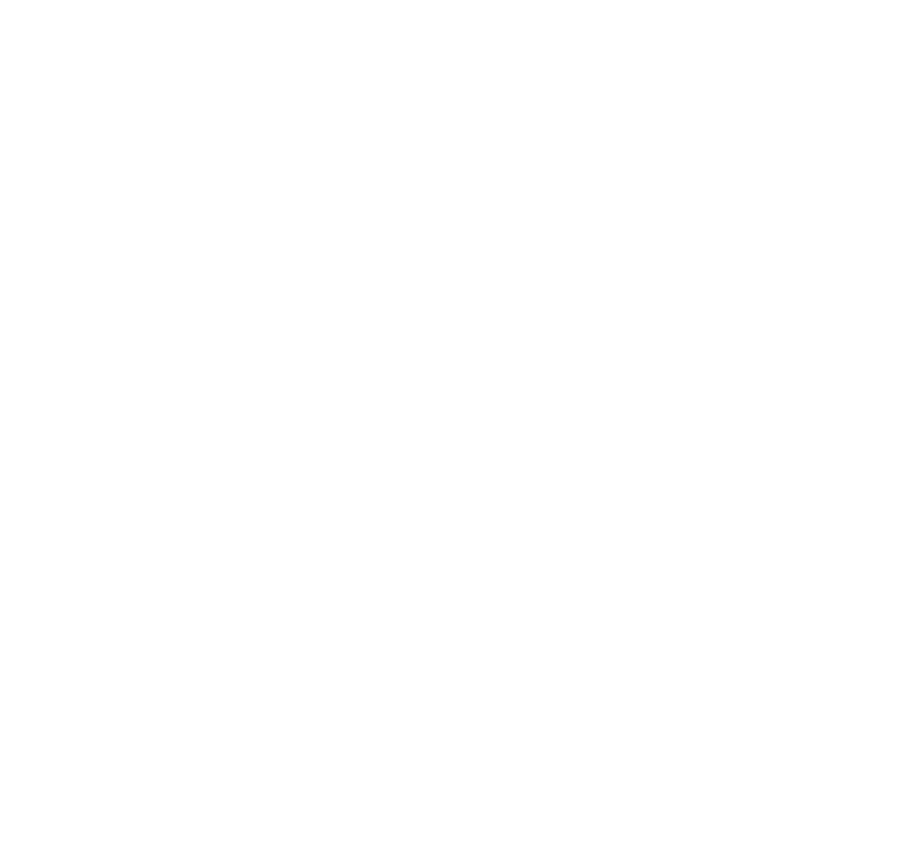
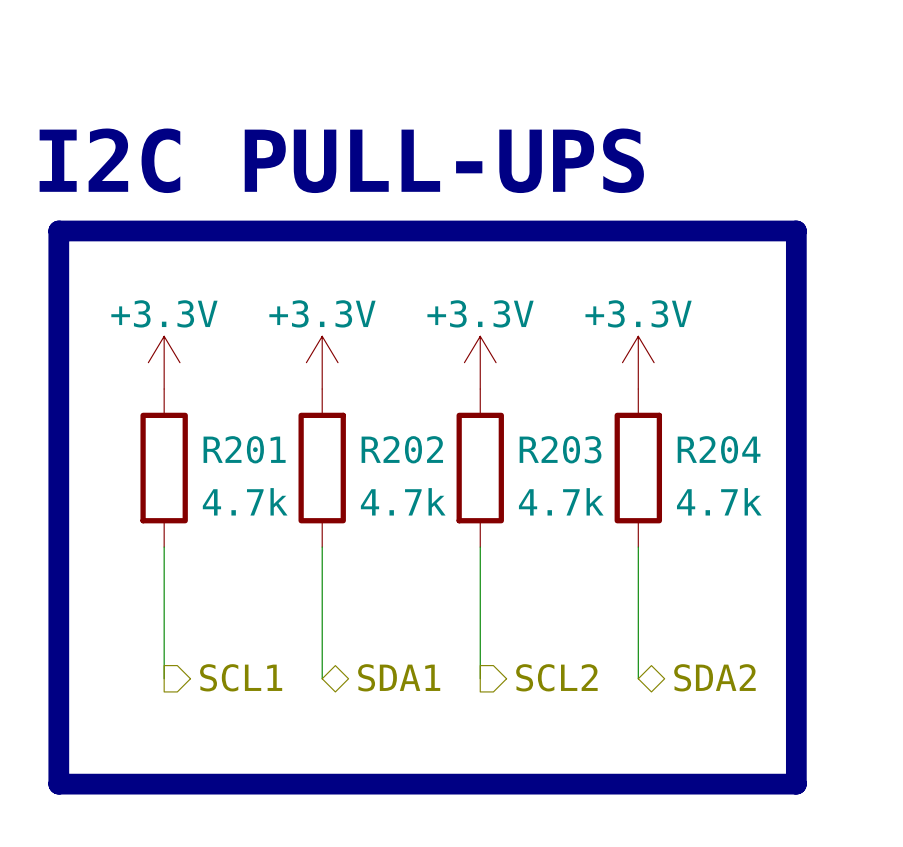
text: none -> I2C PULL-UPS (341, 160)
line: none -> (58, 230) (796, 230) (796, 784) (58, 784) (58, 230)
power symbol: none -> +3.3V (164, 362)
power symbol: none -> +3.3V (322, 362)
power symbol: none -> +3.3V (480, 362)
power symbol: none -> +3.3V (638, 362)
R201: none -> 4.7k (164, 468)
R202: none -> 4.7k (322, 468)
R203: none -> 4.7k (480, 468)
R204: none -> 4.7k (638, 468)
wire: none -> (164, 547) (164, 678)
wire: none -> (322, 547) (322, 678)
wire: none -> (480, 547) (480, 678)
wire: none -> (638, 547) (638, 678)
hierarchical label: none -> SCL1 (241, 677)
hierarchical label: none -> SDA1 (399, 677)
hierarchical label: none -> SCL2 (556, 677)
hierarchical label: none -> SDA2 (714, 677)

